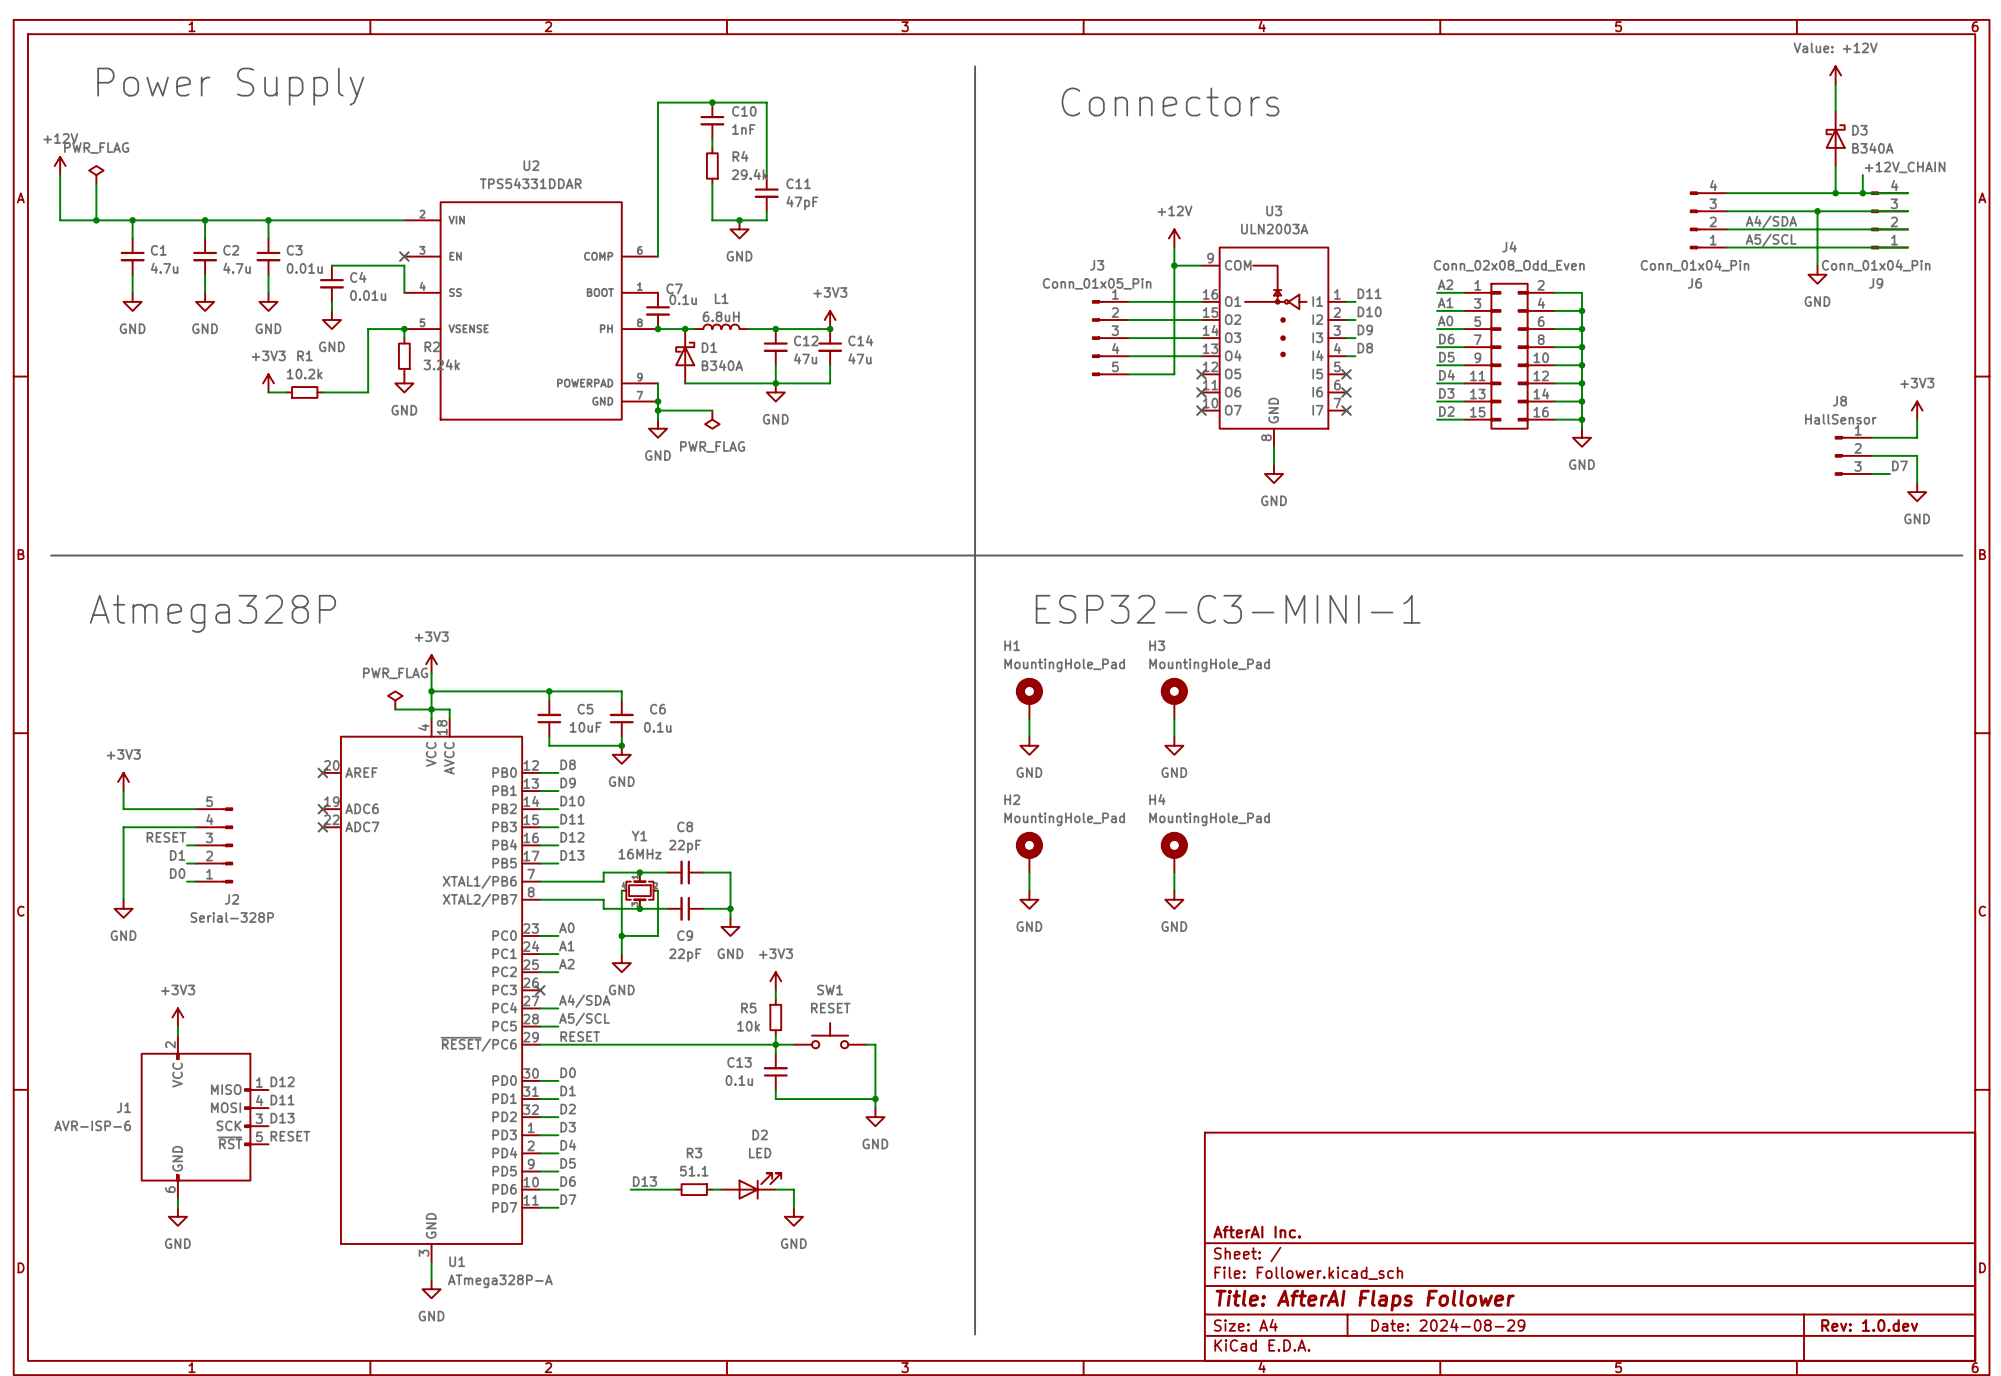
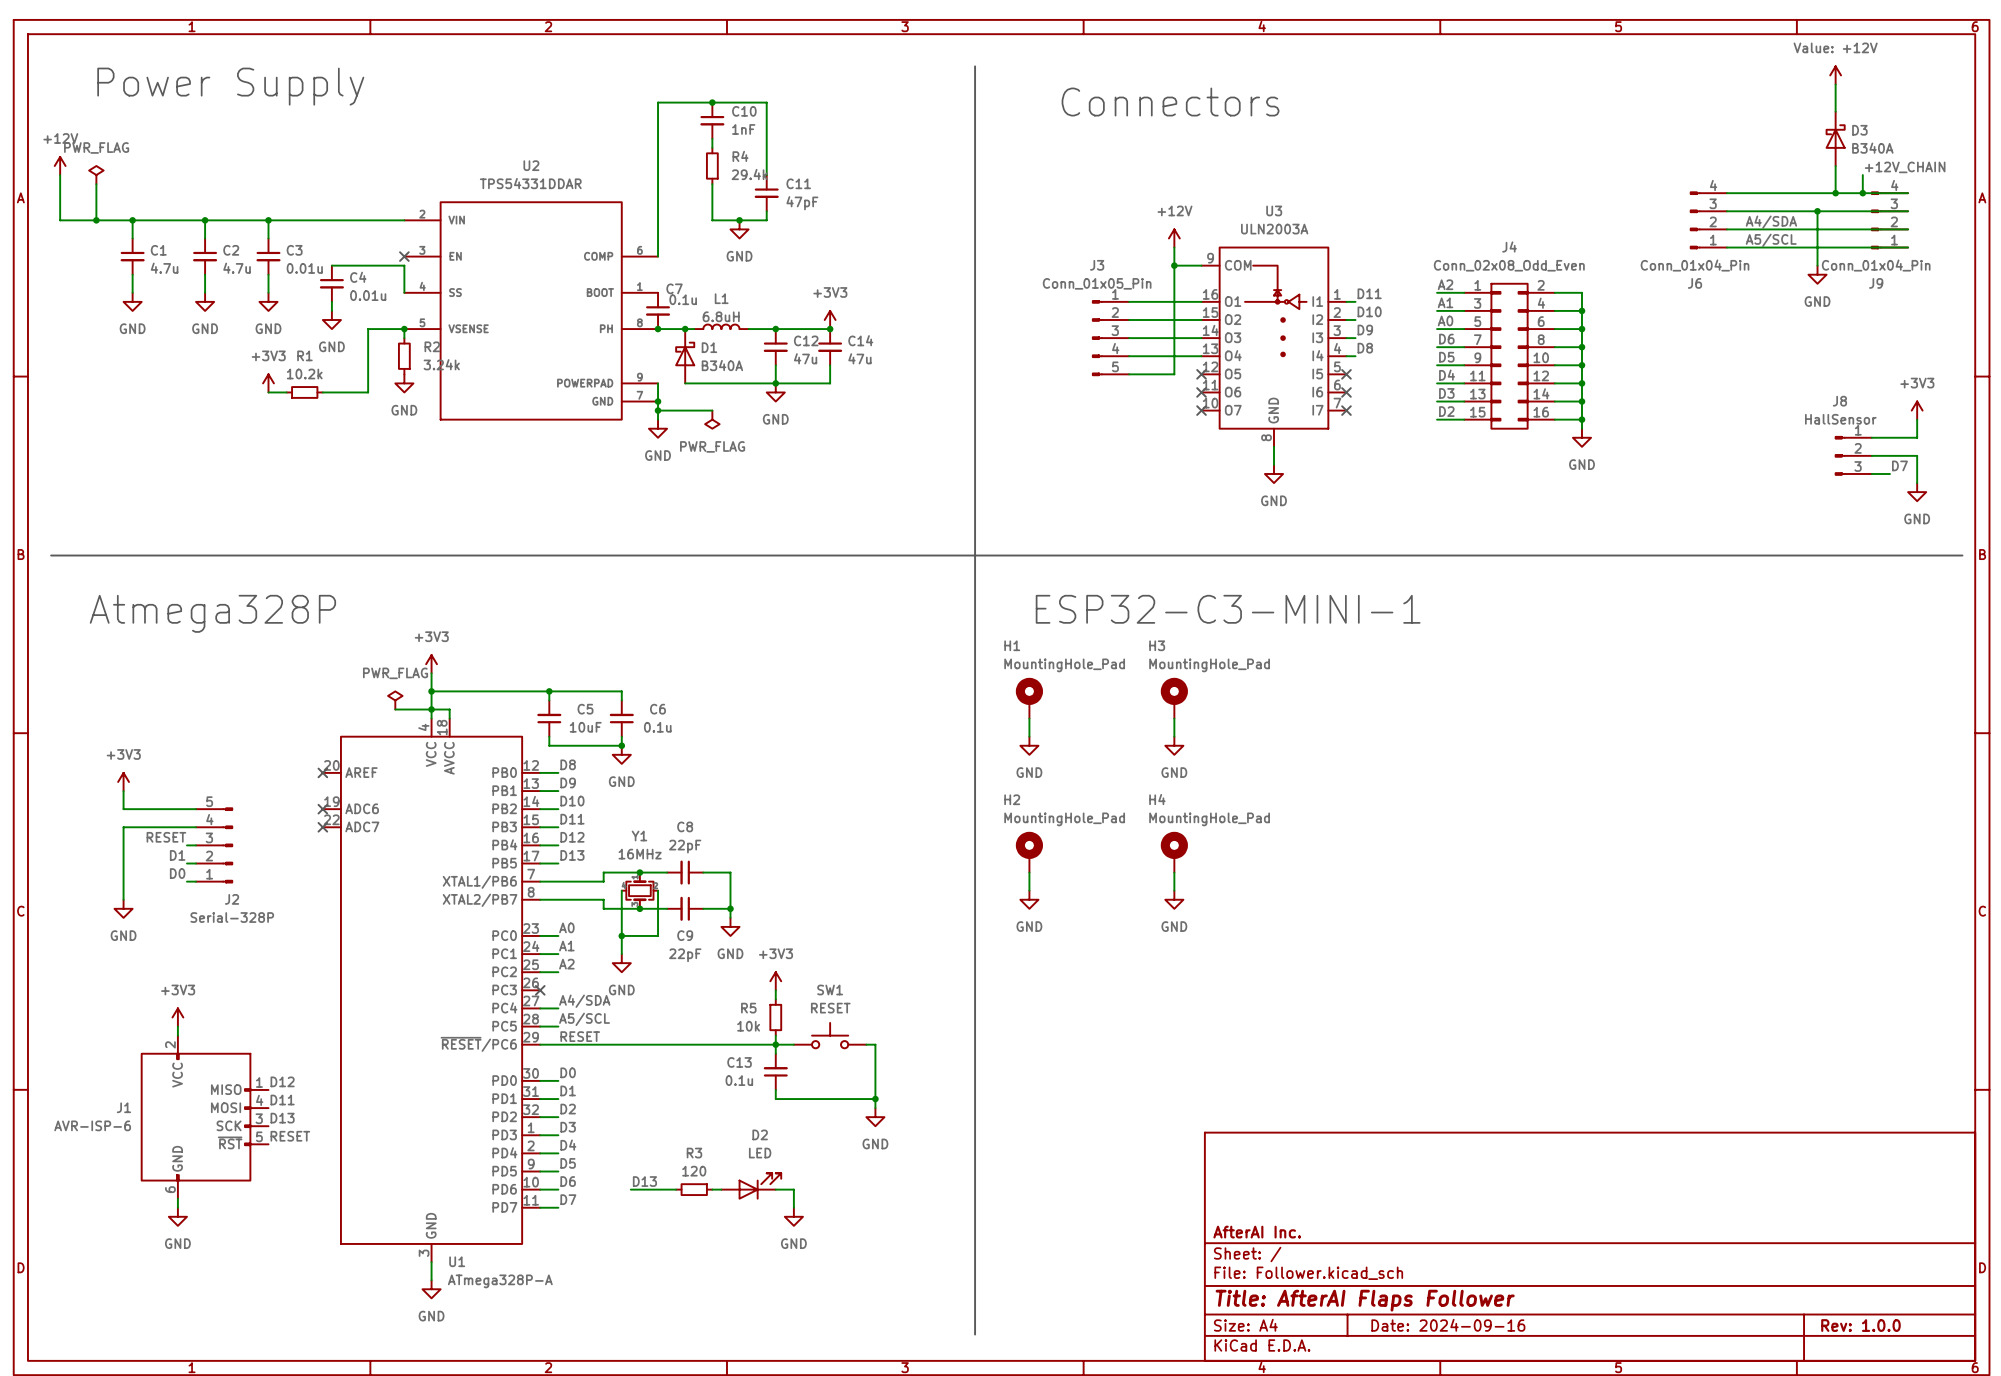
R3 value: 51.1 (694, 1171) -> 120 (694, 1171)
title block: Date: 2024-08-29 (1448, 1325) -> Date: 2024-09-16 (1448, 1325)
title block: Rev: 1.0.dev (1869, 1325) -> Rev: 1.0.0 (1860, 1325)

